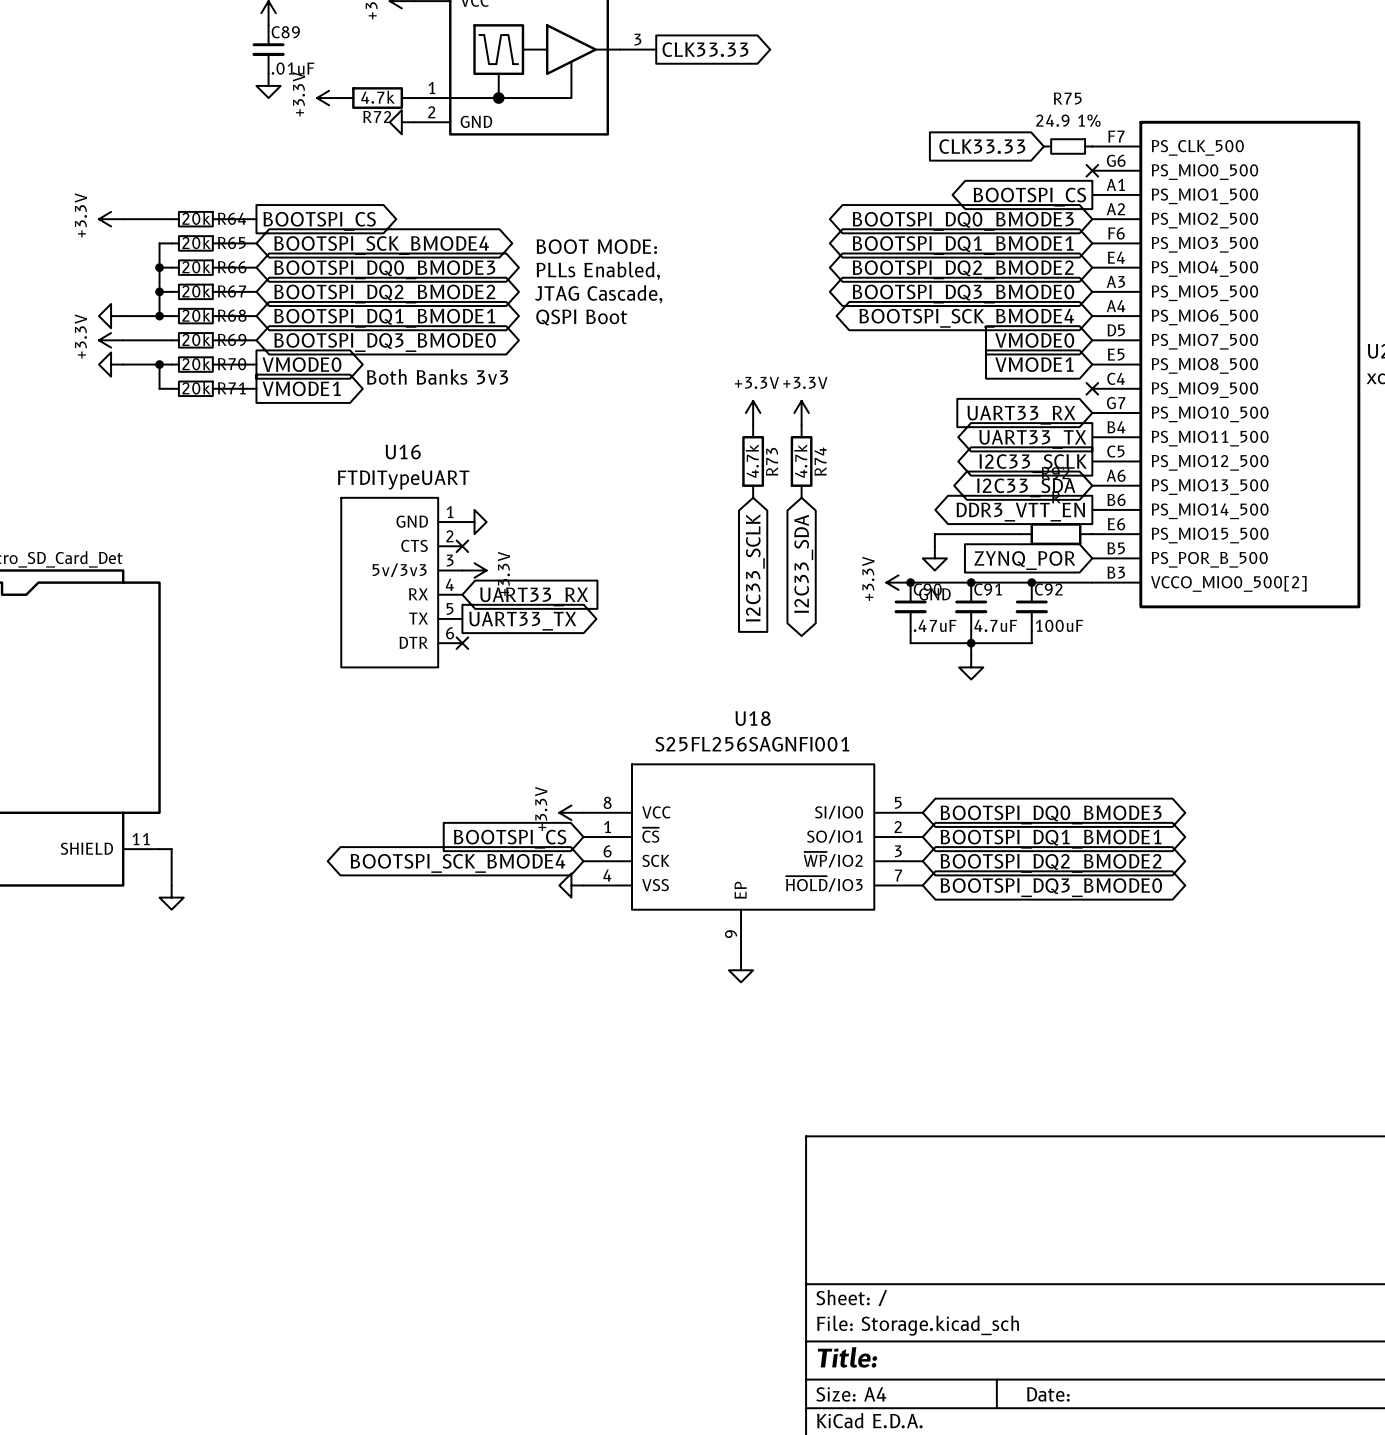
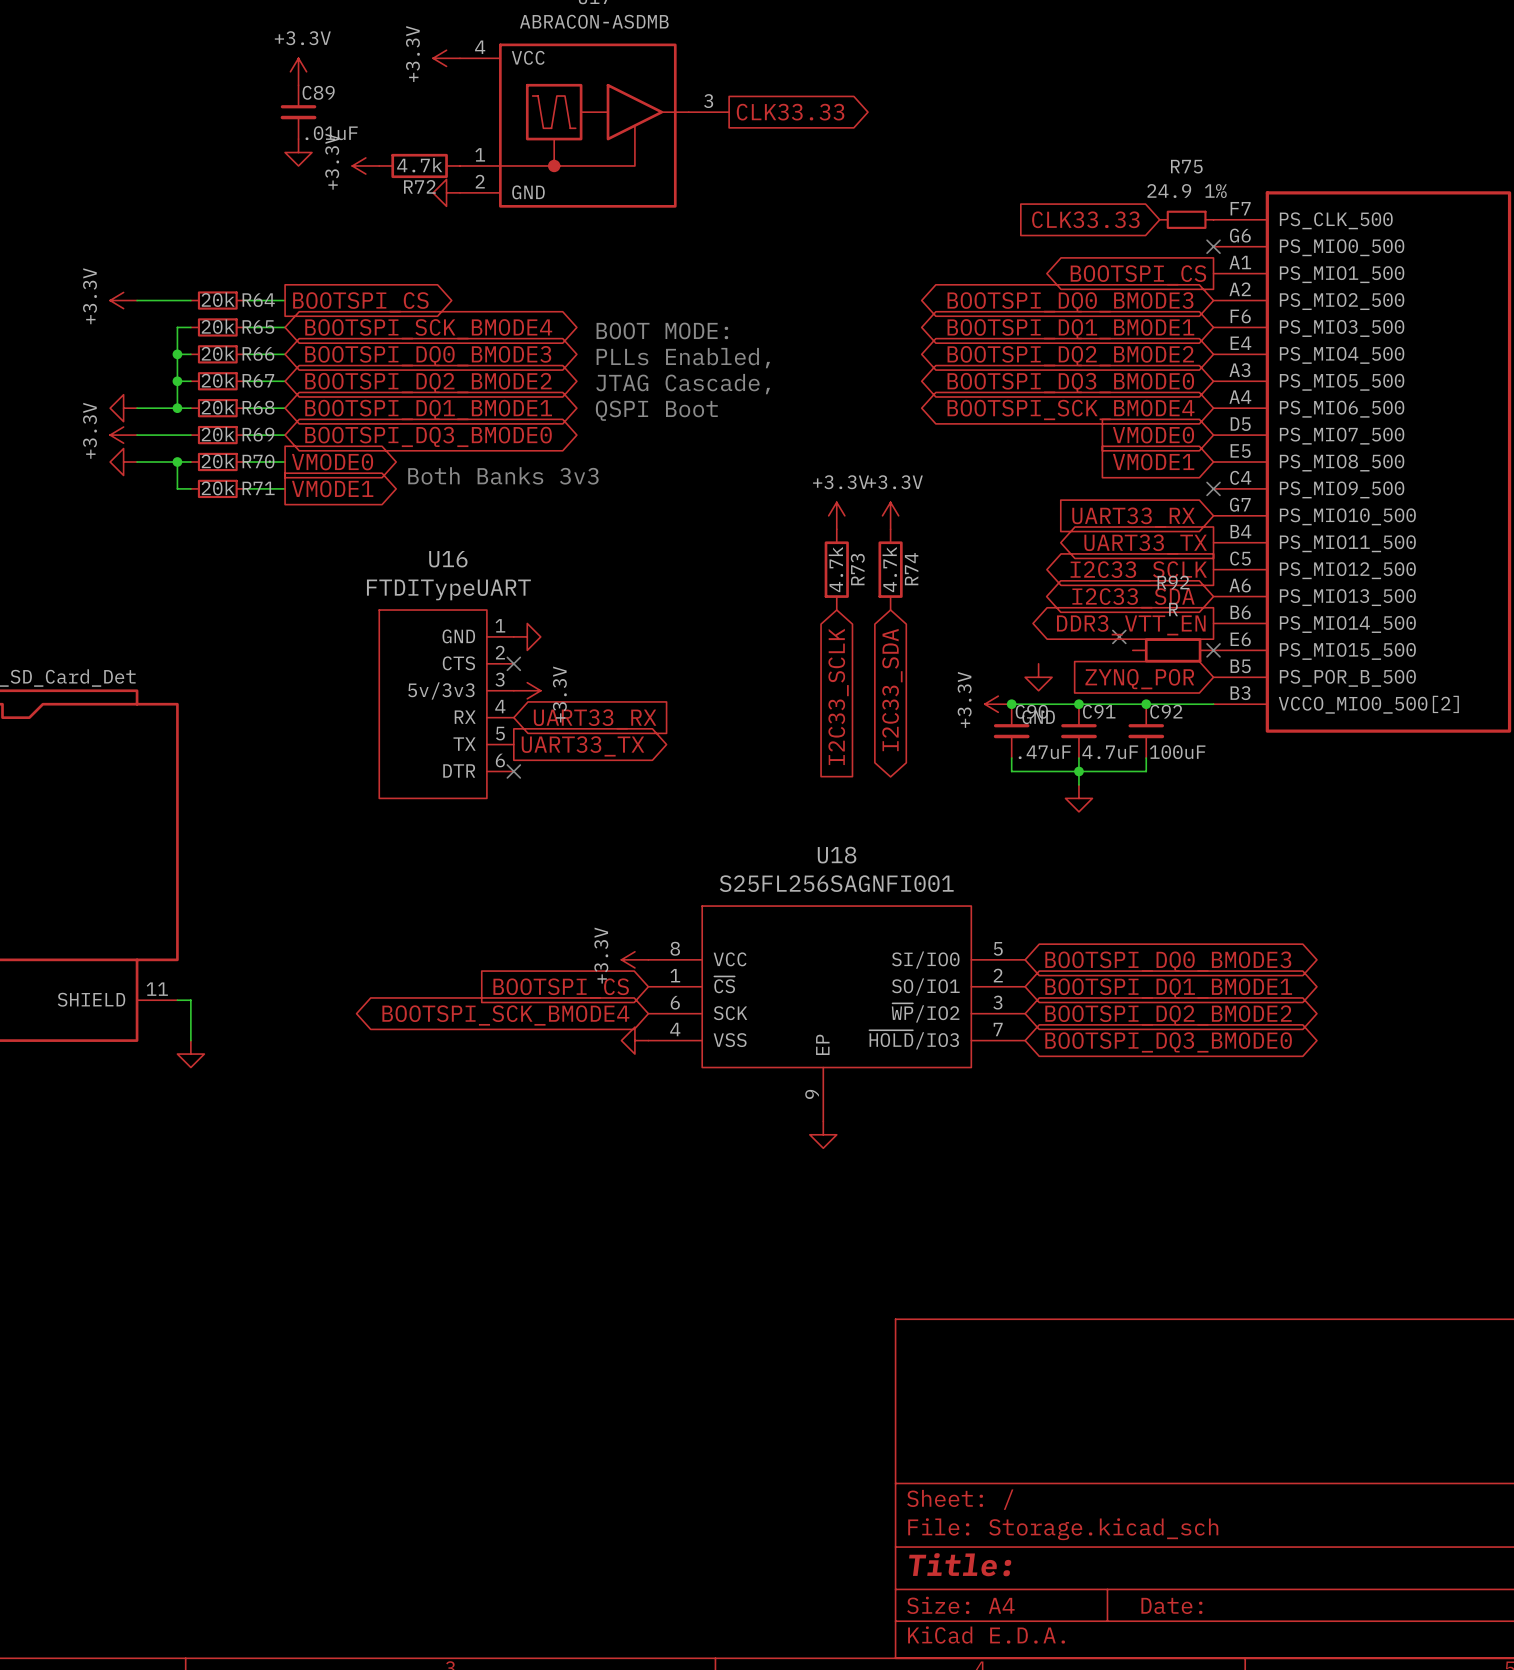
no-connect mark: none -> (1119, 636)
wire: (1019, 534) (934, 534) (934, 546) -> none
no-connect mark: none -> (1213, 650)

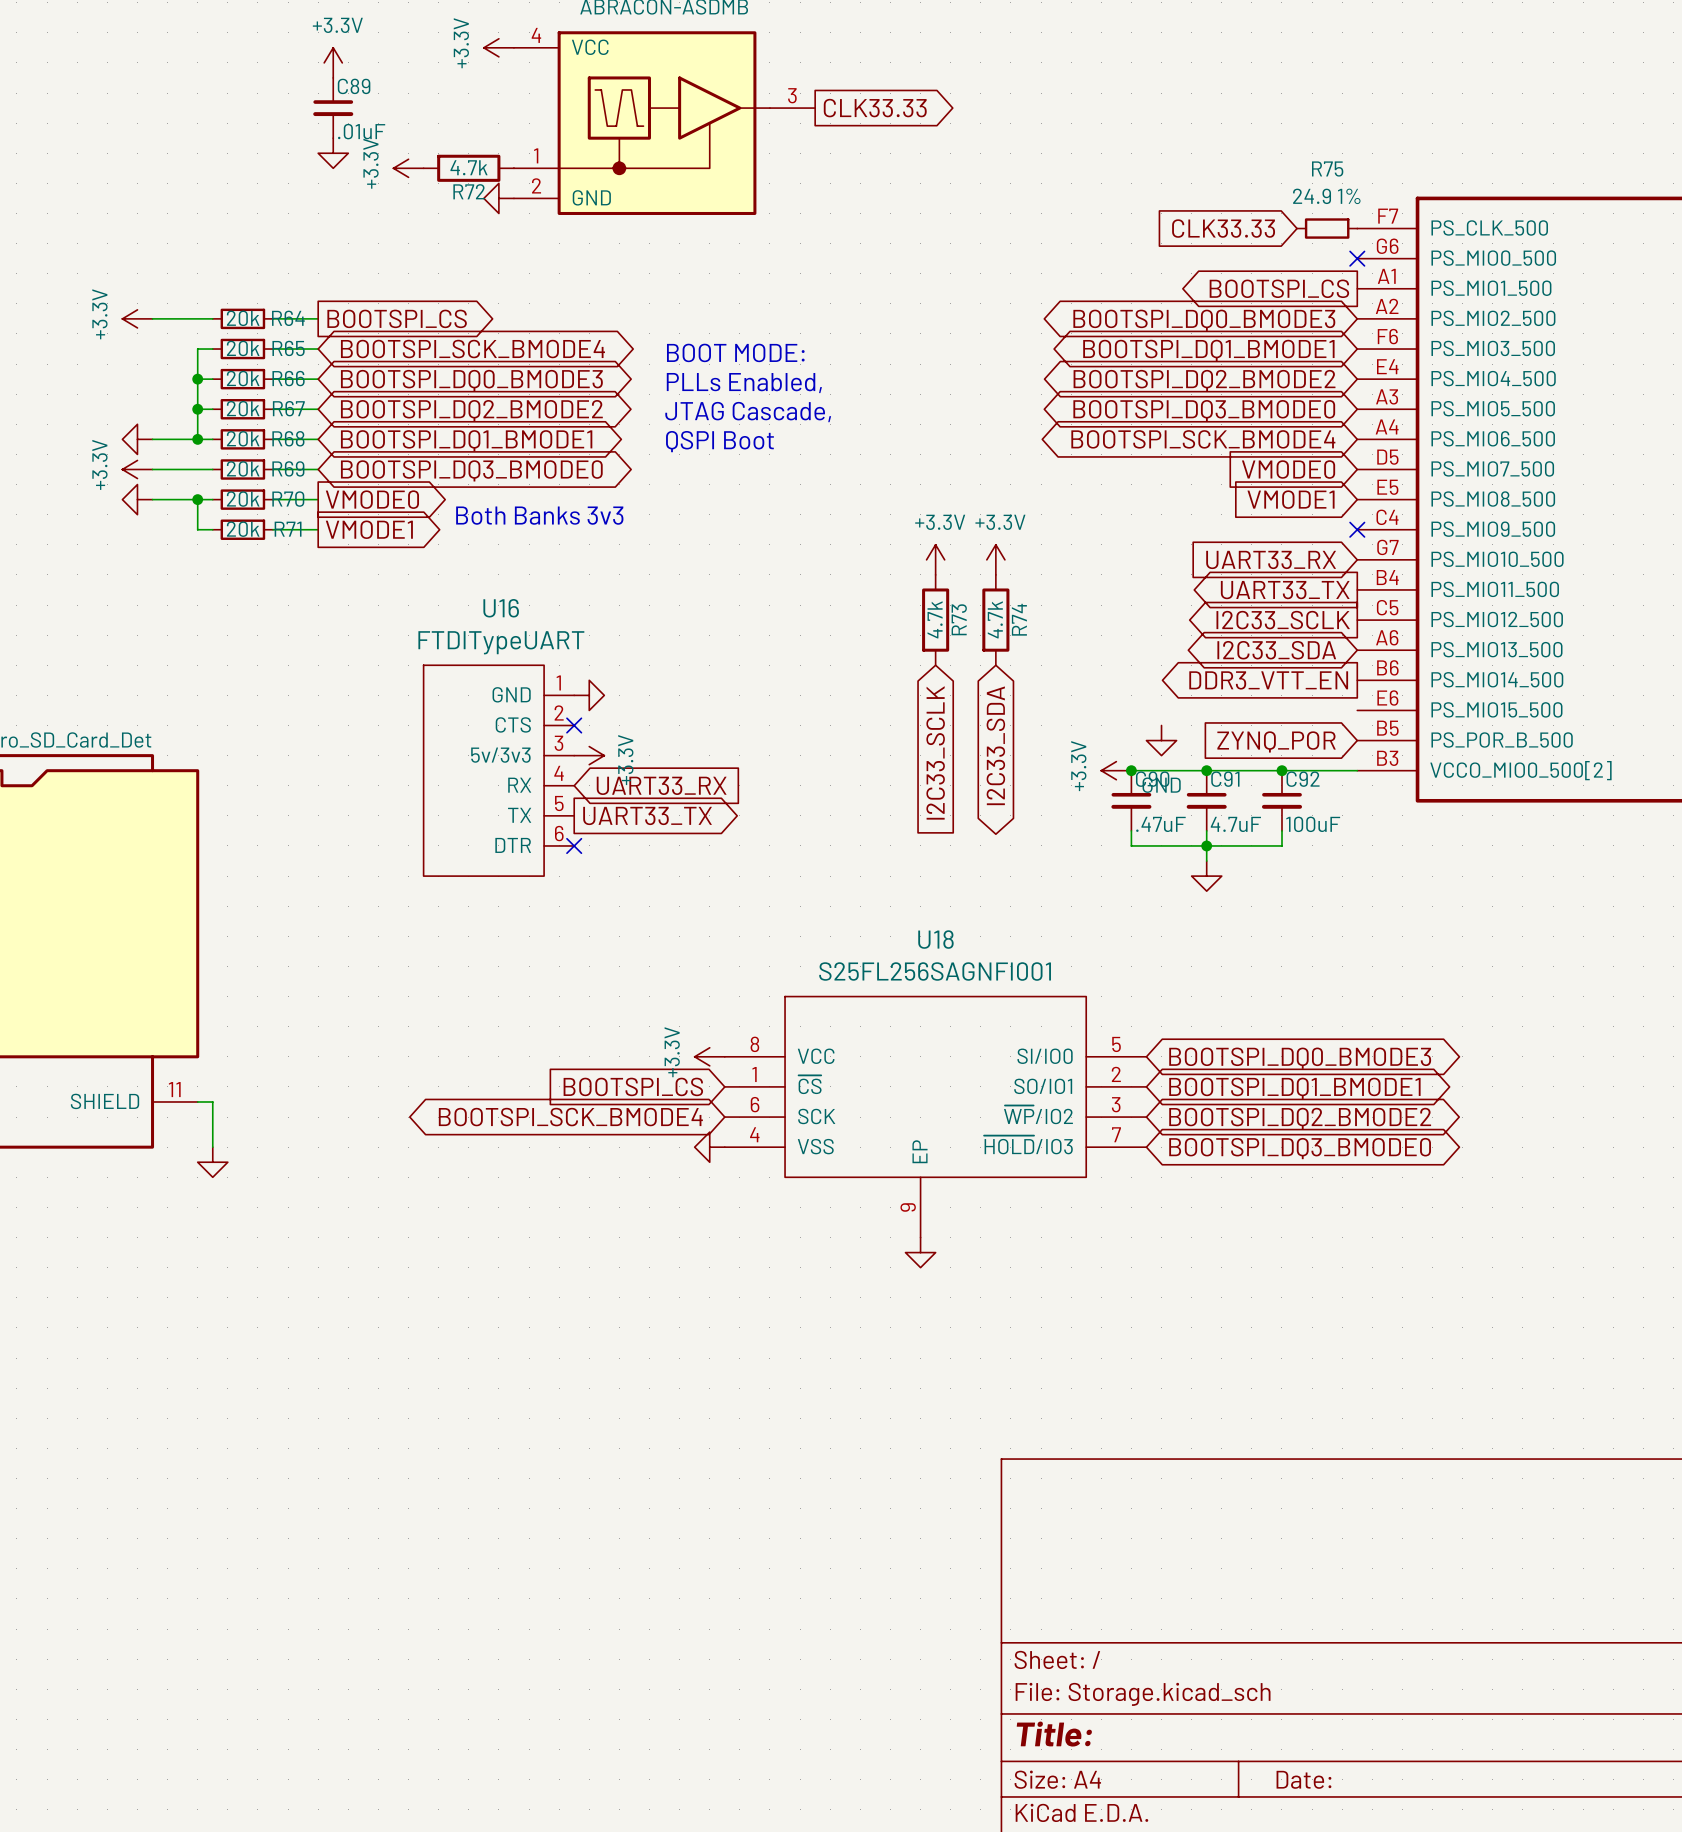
no-connect mark: (1119, 636) -> none
R92: R (1173, 650) -> none
no-connect mark: (1213, 650) -> none

